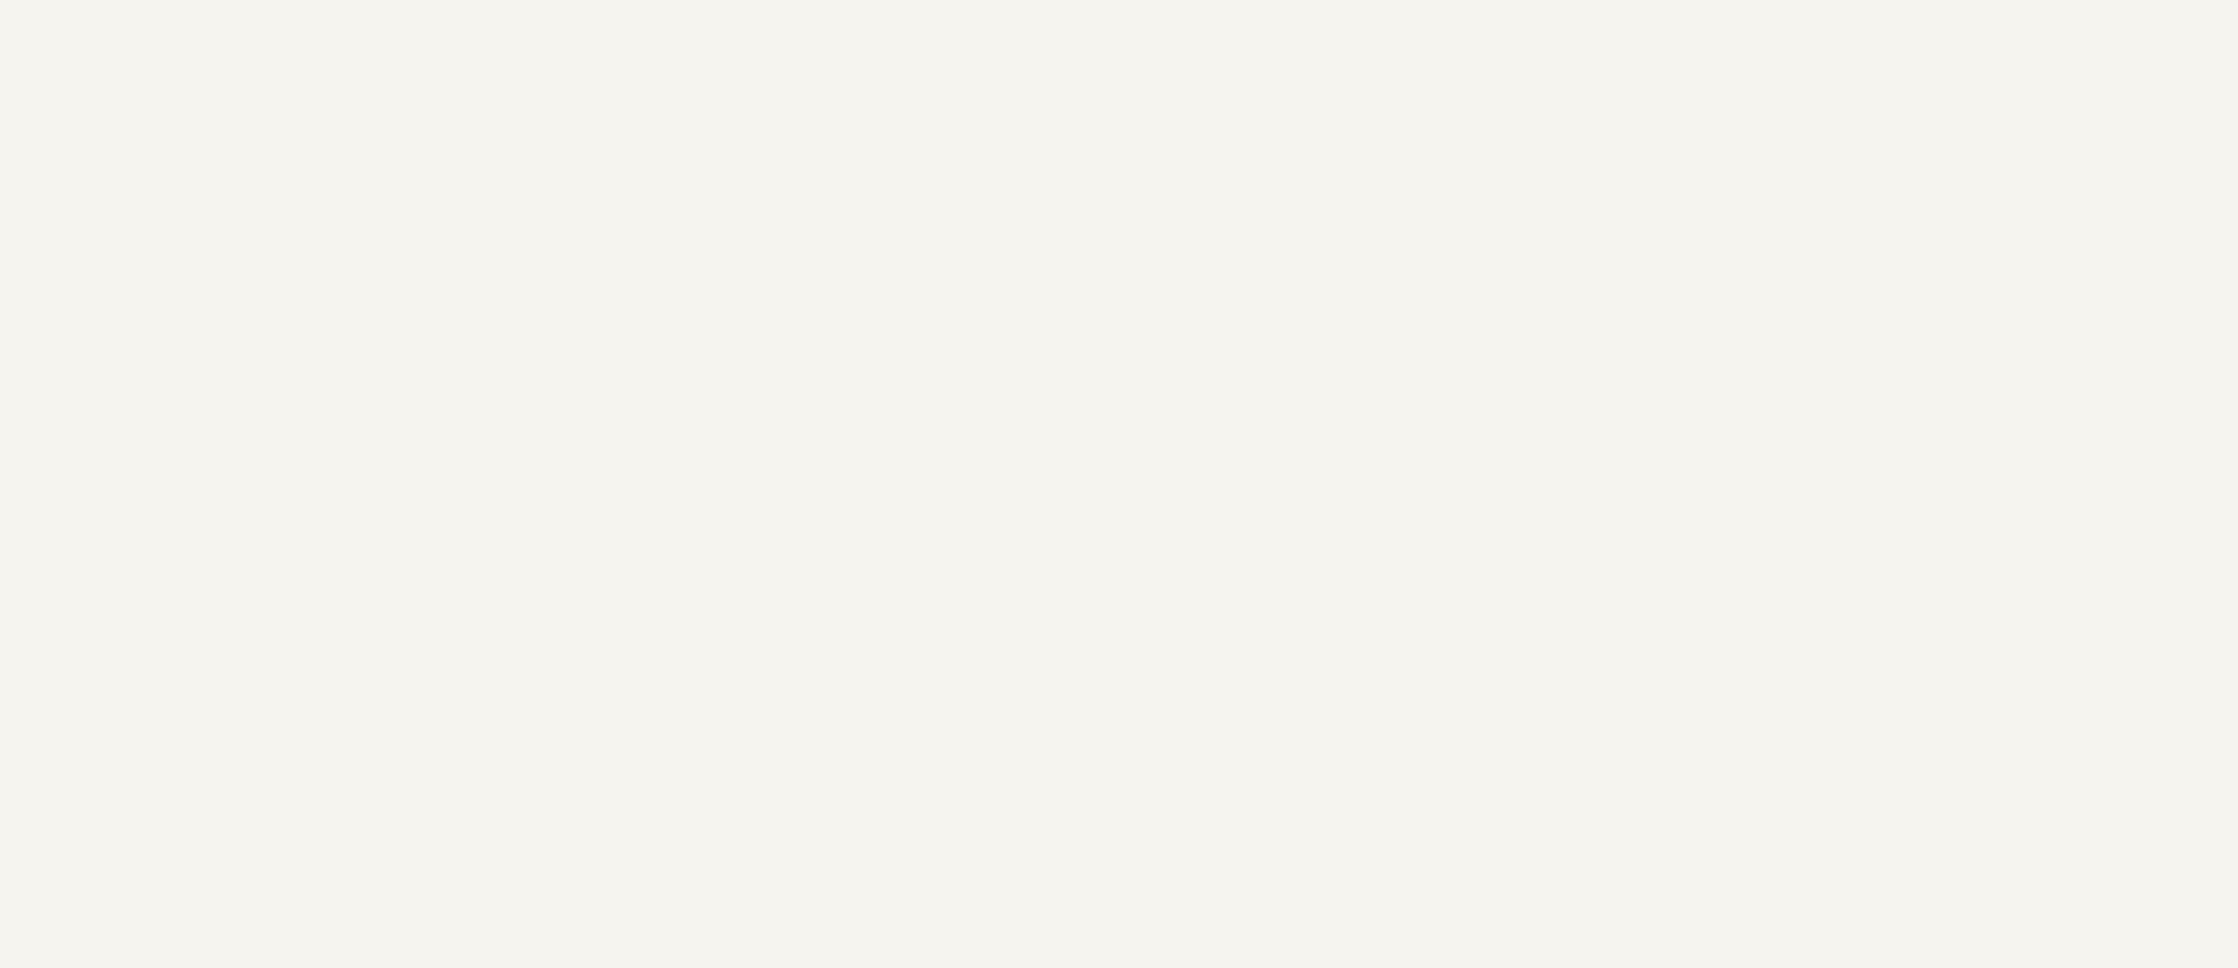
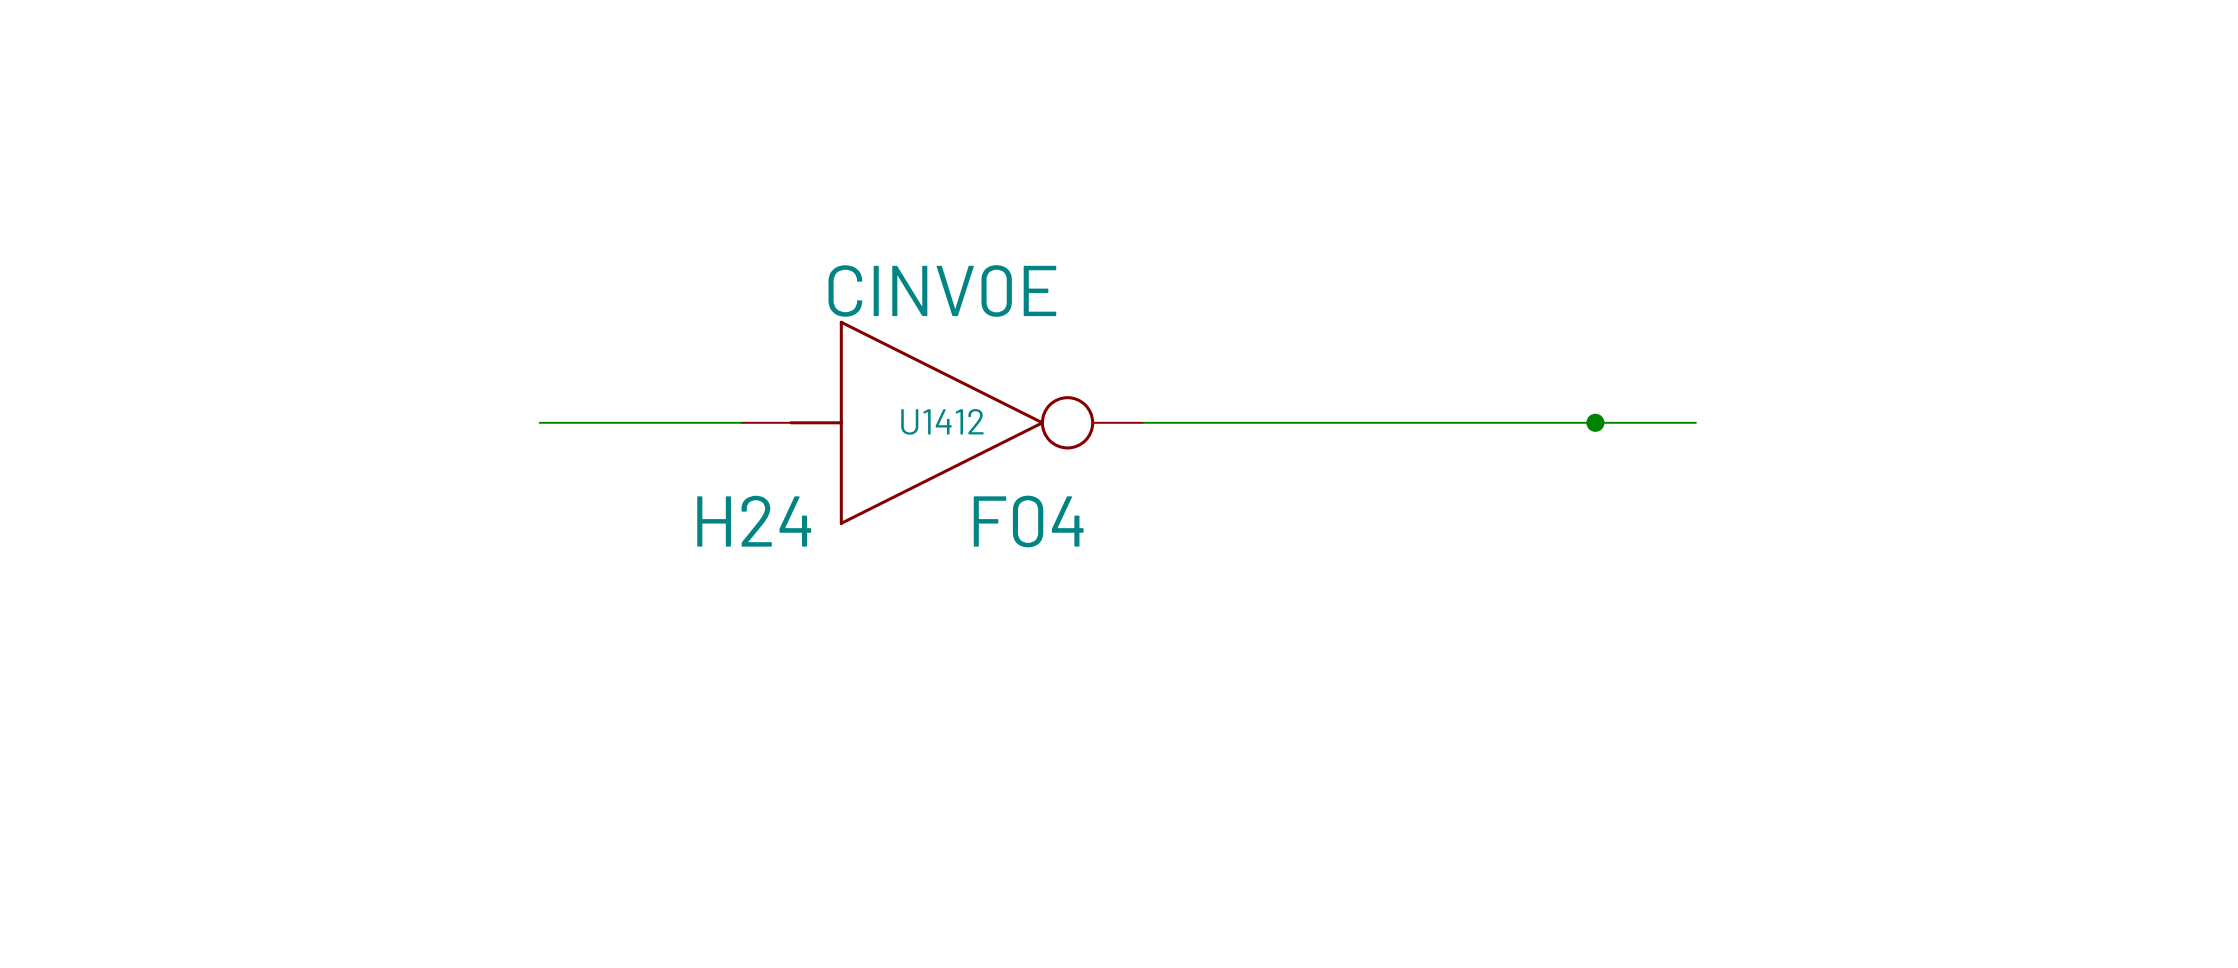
wire: none -> (539, 422) (740, 422)
U1412: none -> F04 (941, 422)
wire: none -> (1142, 422) (1695, 422)
junction: none -> (1595, 422)

